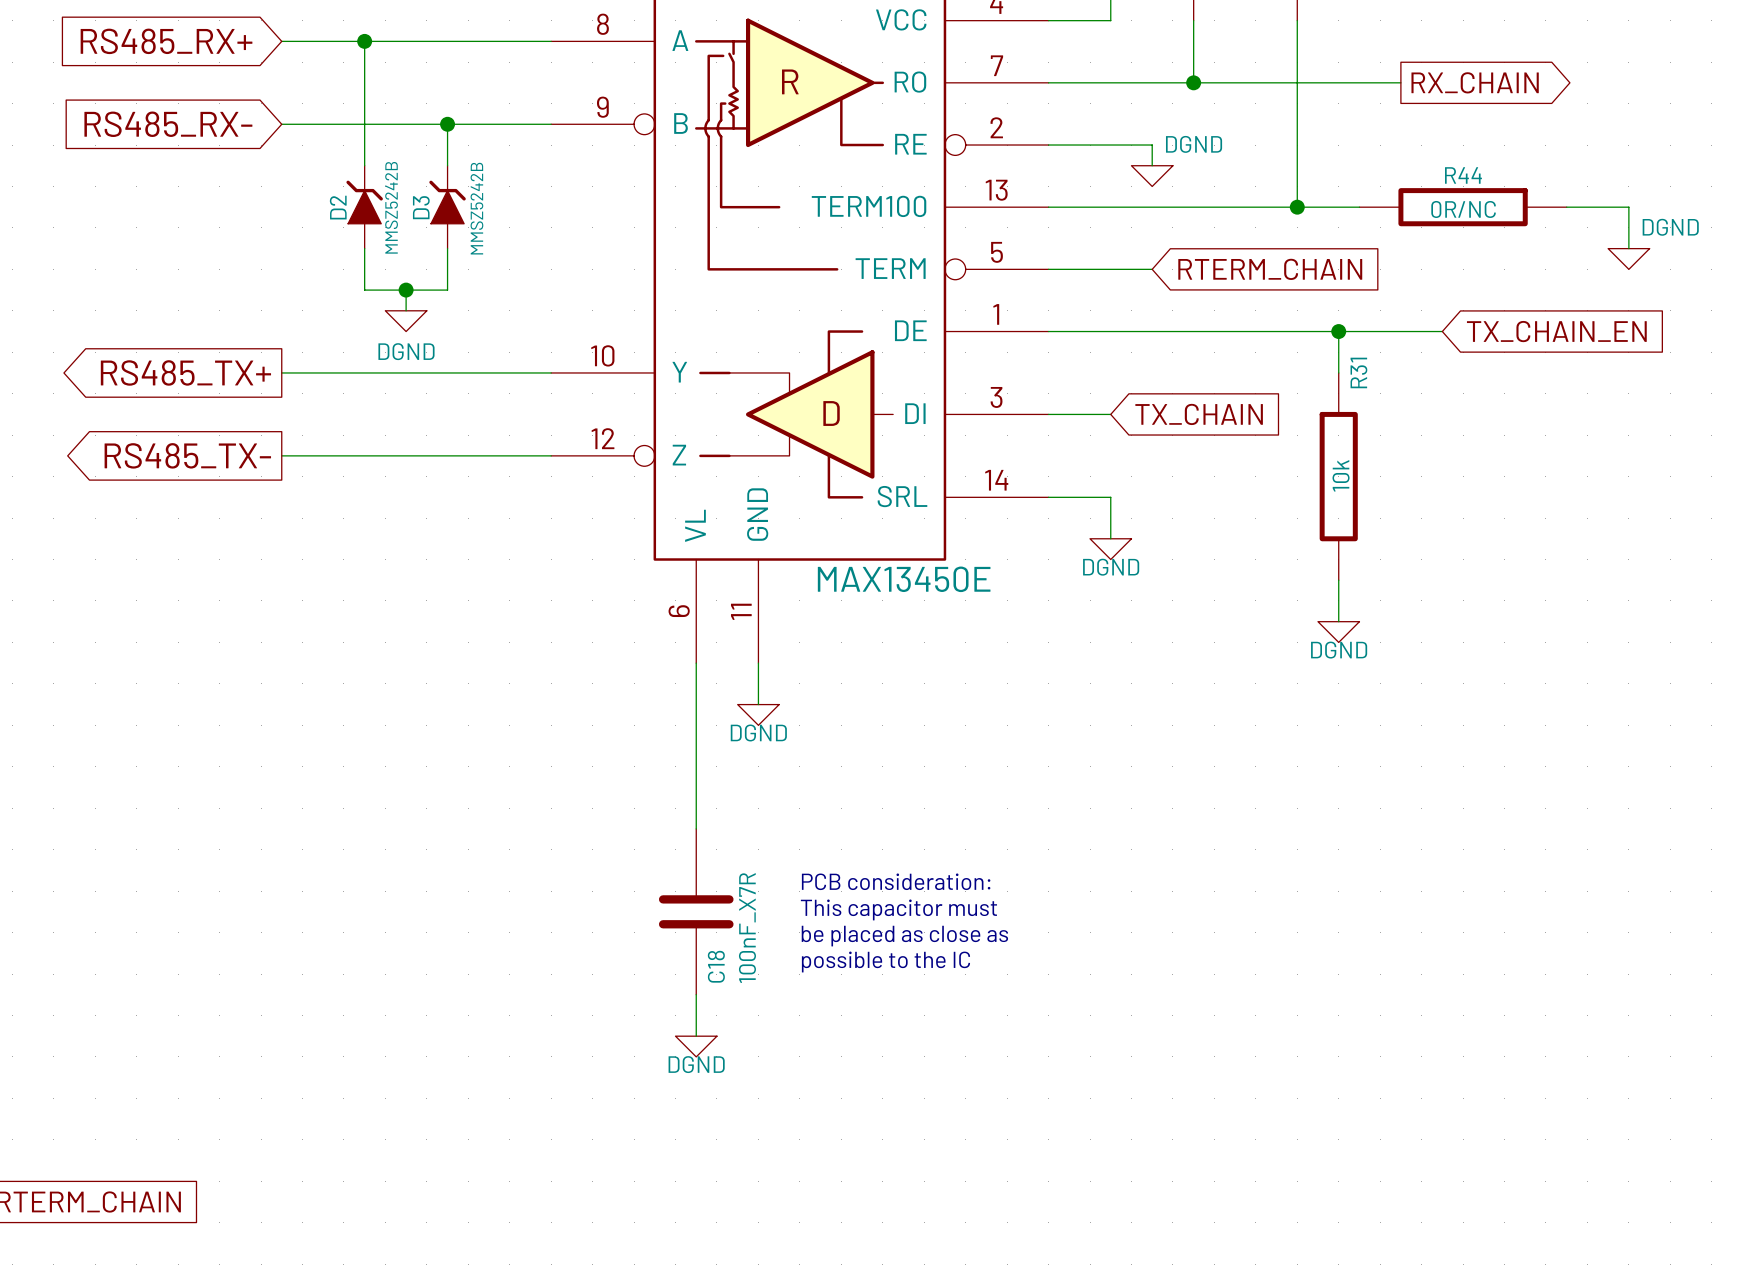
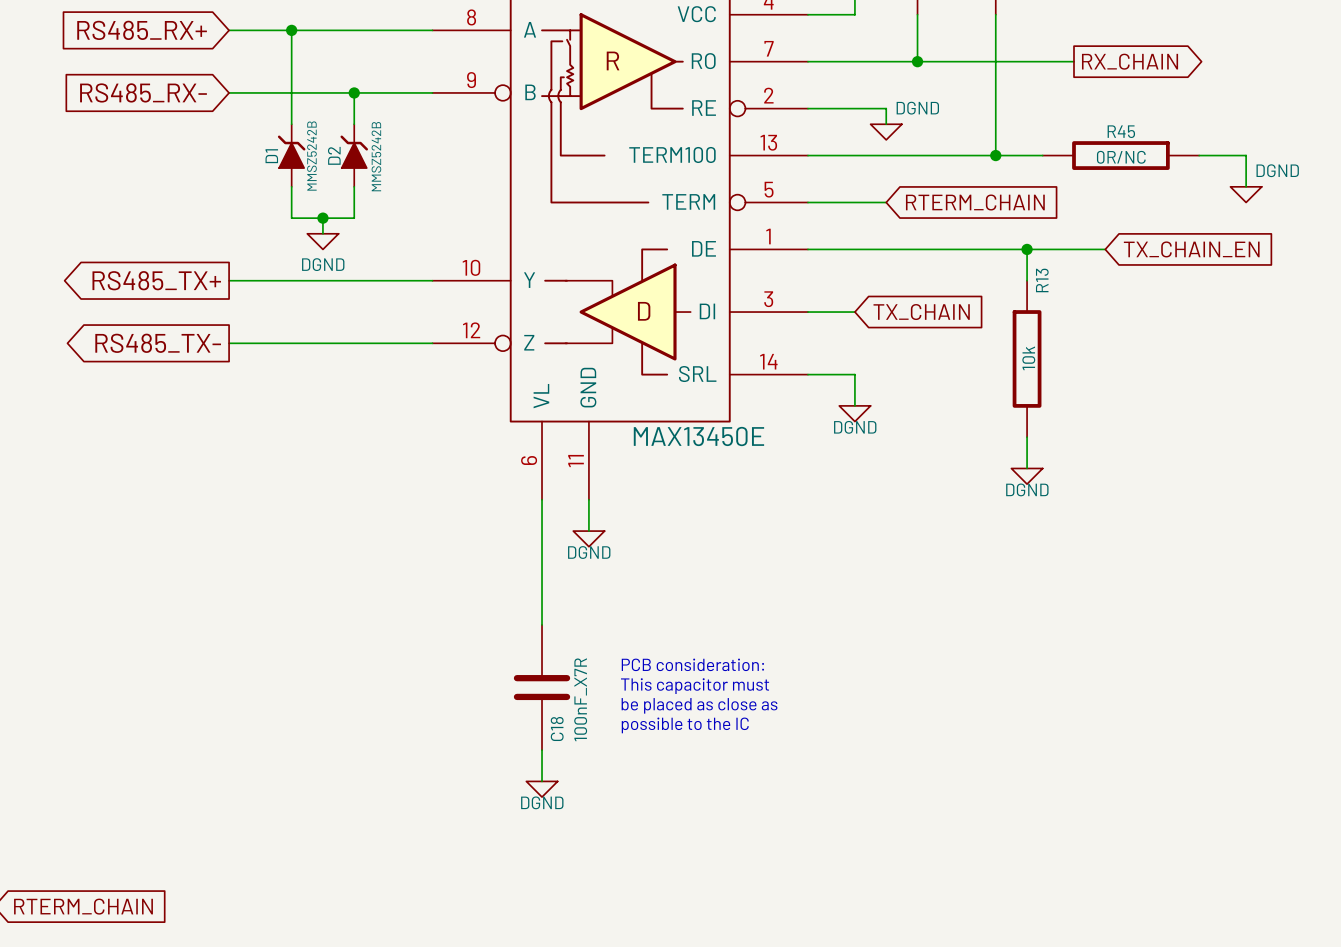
R44 name: R44 (1463, 175) -> R45 (1121, 131)
D2 name: D2 (338, 207) -> D1 (271, 156)
D3 name: D3 (421, 207) -> D2 (334, 155)
R31 name: R31 (1358, 372) -> R13 (1042, 280)

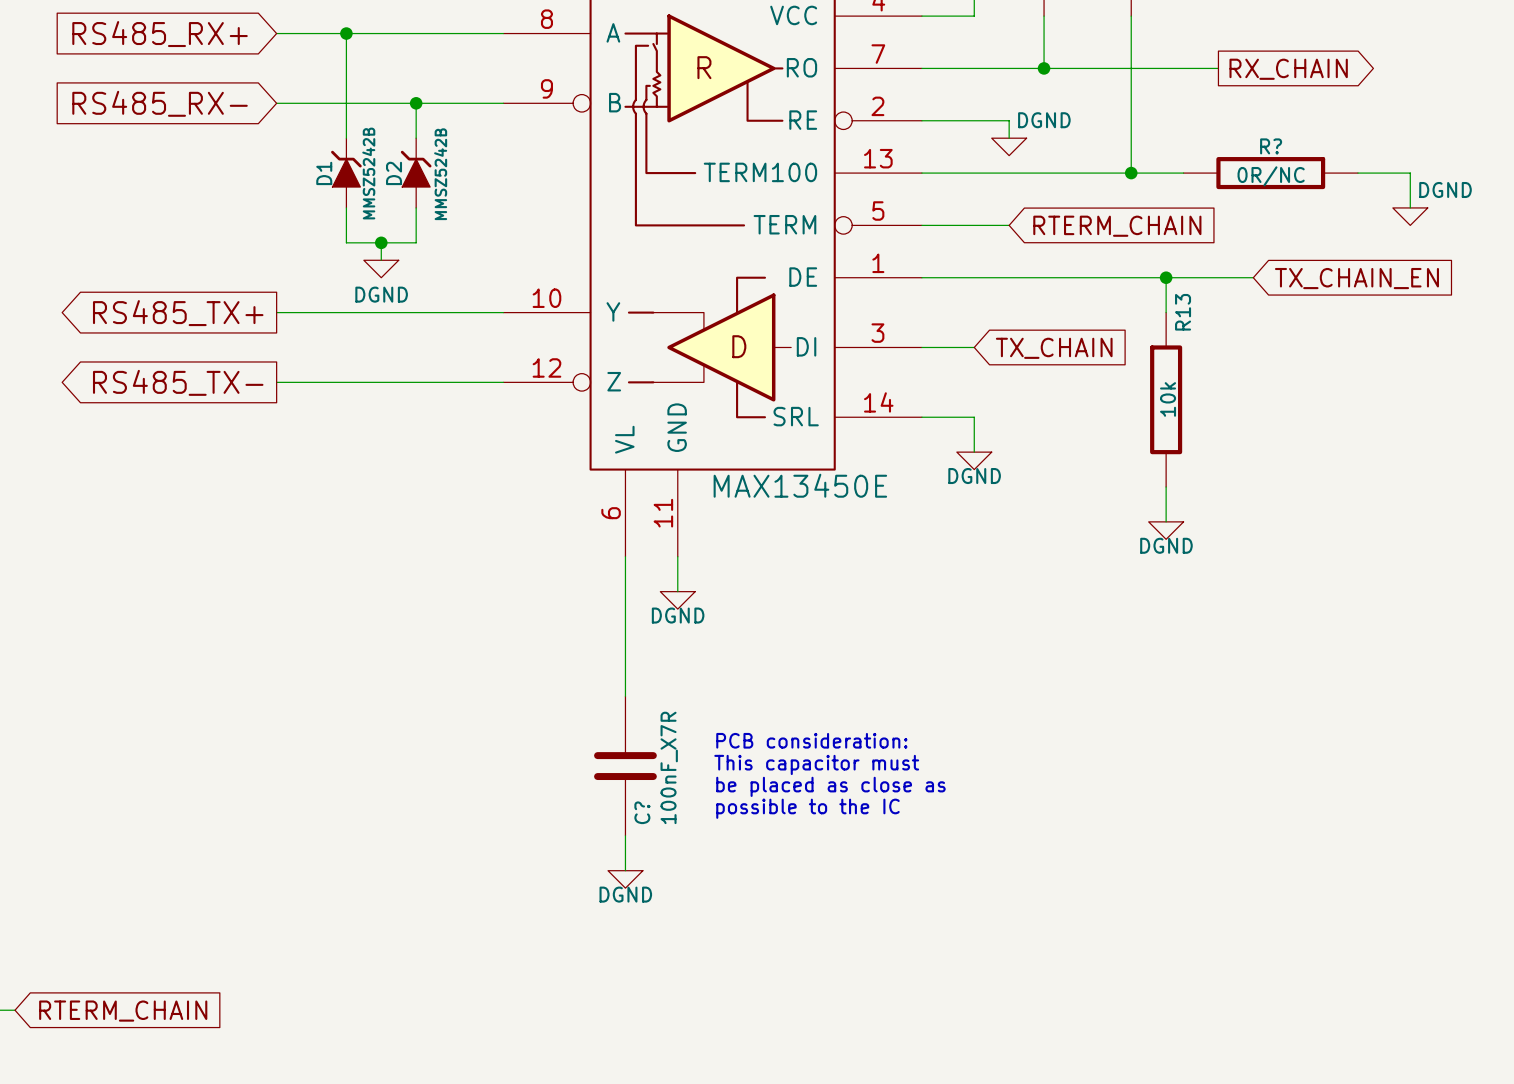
R45 name: R45 (1121, 131) -> R? (1271, 146)
C18 name: C18 (557, 728) -> C? (642, 812)

